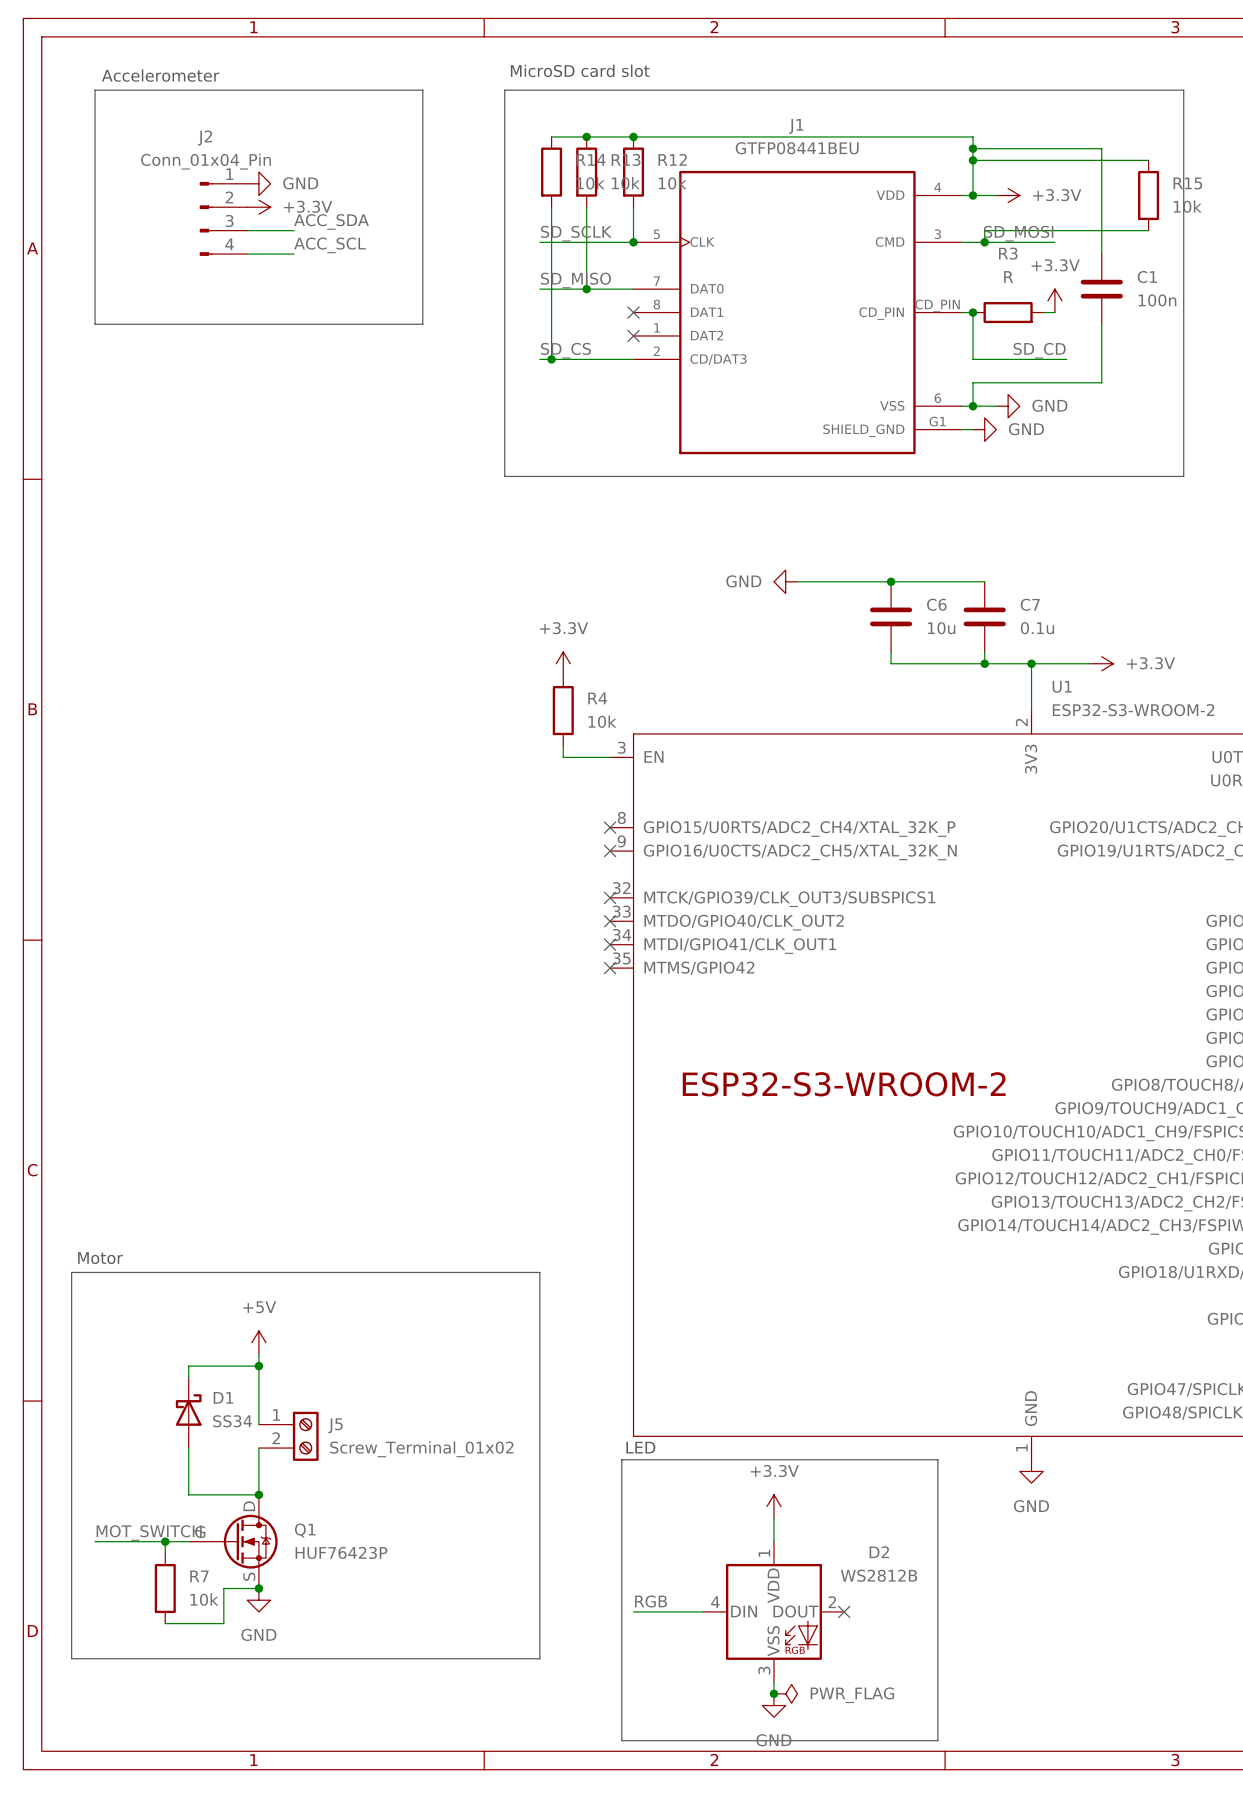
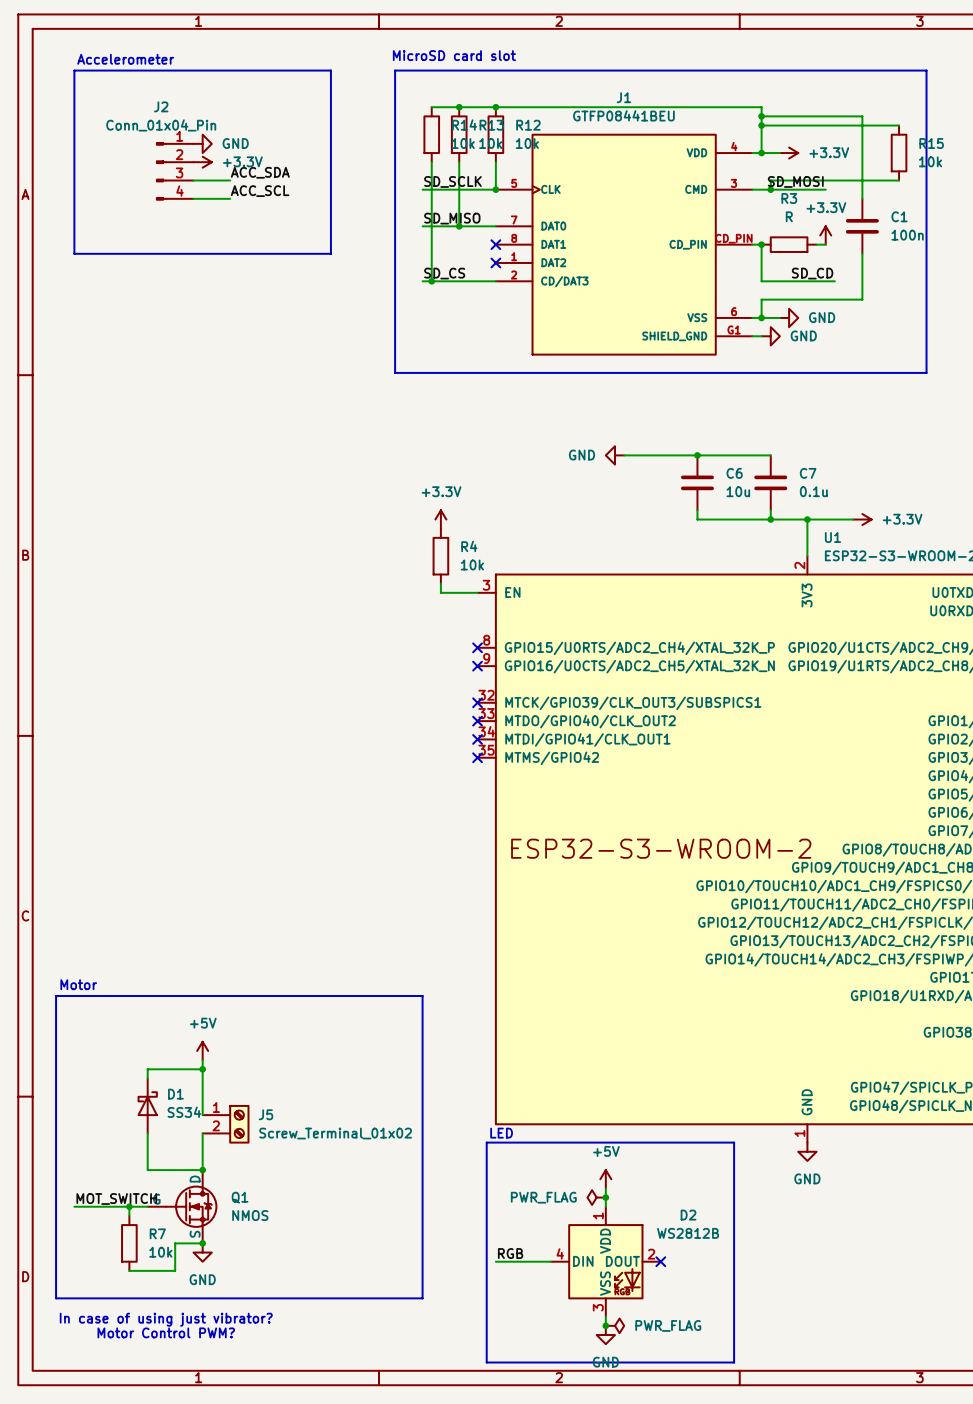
power symbol: +3.3V (773, 1506) -> +5V (605, 1179)
power symbol: none -> PWR_FLAG (596, 1197)
junction: none -> (605, 1197)
Q1 value: HUF76423P (341, 1552) -> NMOS (250, 1215)
text: none -> In case of using just vibrator? (166, 1319)
text: none -> Motor Control PWM? (166, 1332)

